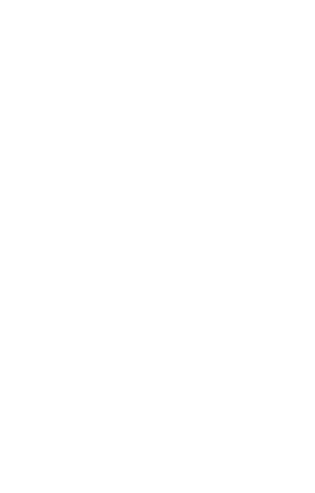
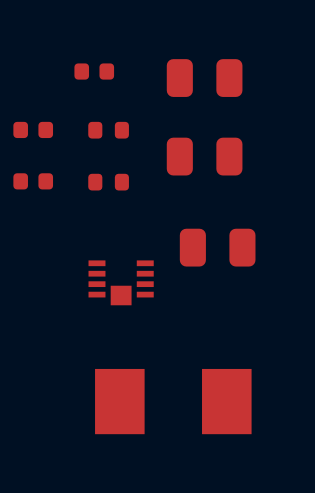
part: none -> (94, 71)
part: none -> (204, 78)
part: none -> (33, 129)
part: none -> (108, 130)
part: none -> (204, 156)
part: none -> (33, 181)
part: none -> (108, 182)
part: none -> (217, 247)
part: none -> (121, 282)
part: none -> (173, 401)

